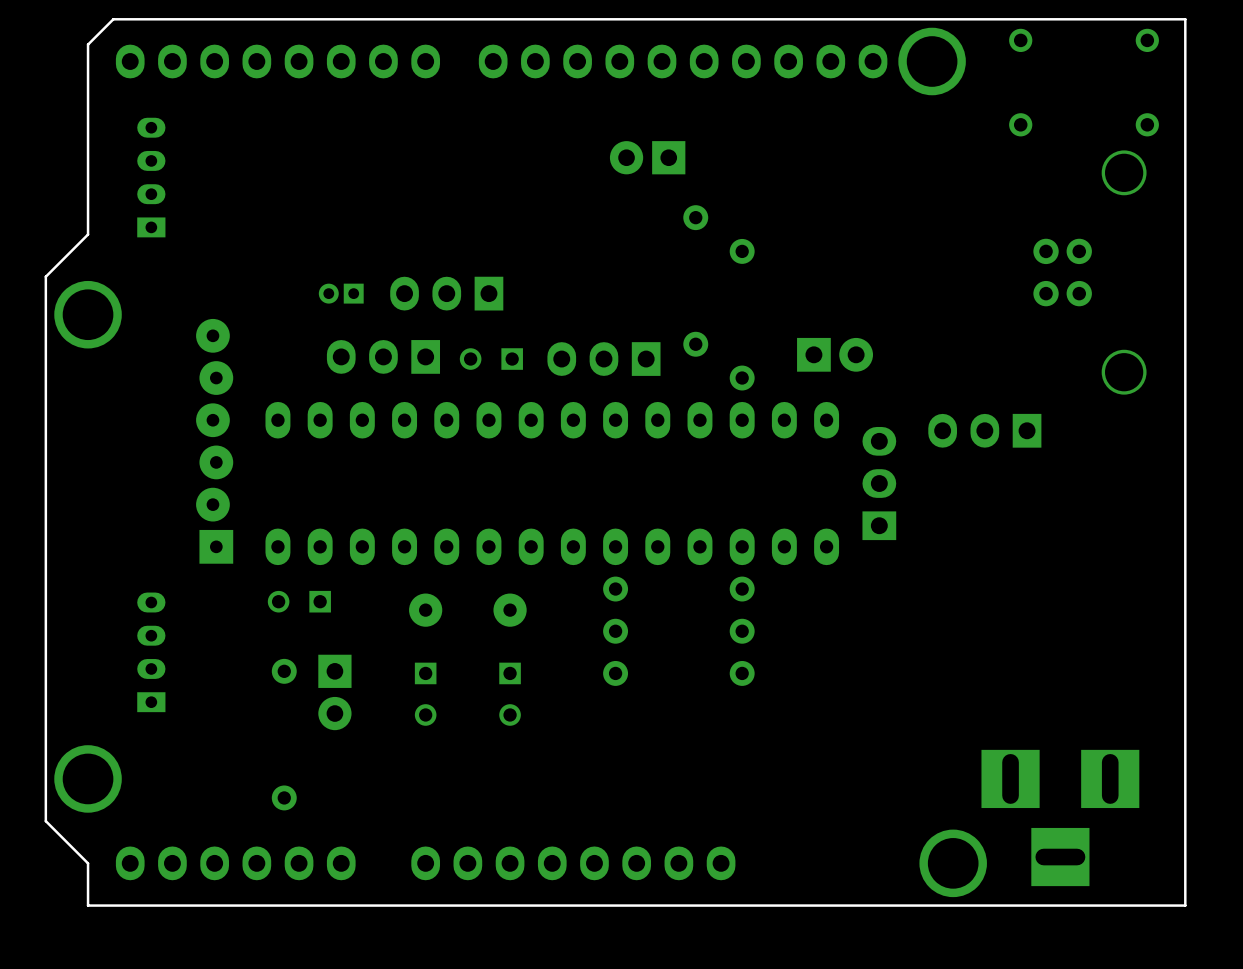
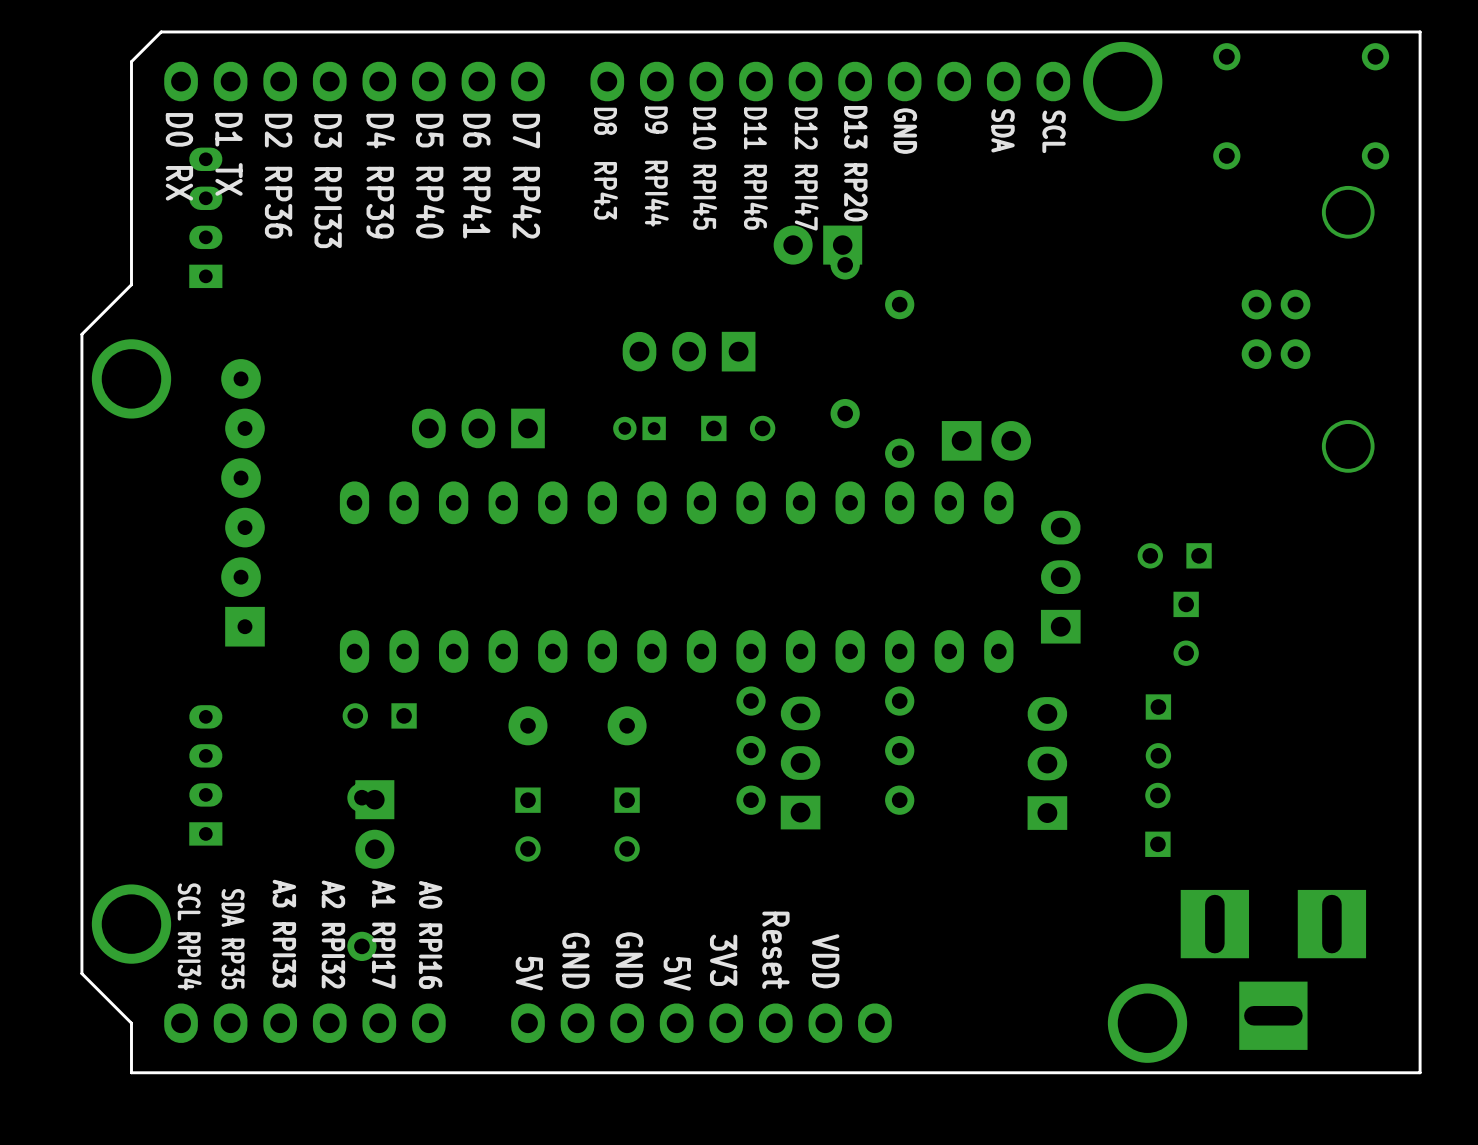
text: none -> GND (905, 131)
text: none -> SDA (1003, 130)
text: none -> SCL (1054, 131)
text: none -> D1 TX (229, 154)
text: none -> D0 RX (179, 156)
text: none -> D8 RP43 (605, 163)
text: none -> D13 RP20 (855, 163)
text: none -> D9 RPI44 (656, 166)
text: none -> D10 RPI45 (705, 168)
text: none -> D11 RPI46 (755, 168)
text: none -> D12 RPI47 (806, 169)
text: none -> D2 RP36 (278, 176)
text: none -> D4 RP39 (380, 176)
text: none -> D5 RP40 (430, 176)
text: none -> D6 RP41 (477, 176)
text: none -> D7 RP42 (526, 176)
text: none -> D3 RPI33 (328, 181)
part position: (647, 157) -> (817, 245)
part position: (341, 293) -> (639, 428)
part position: (446, 293) -> (689, 351)
part footprint: [547, 342, 661, 376] -> [701, 415, 776, 442]
part position: (835, 354) -> (986, 440)
part: (491, 359) -> none
part: (984, 430) -> none
part position: (214, 441) -> (243, 502)
part: none -> (1174, 555)
part: none -> (1186, 628)
part: none -> (1158, 731)
part: none -> (800, 763)
part: none -> (1047, 763)
part: none -> (1157, 819)
part position: (334, 692) -> (374, 824)
text: none -> A3 RPI33 (284, 933)
text: none -> A2 RPI32 (333, 934)
text: none -> A1 RPI17 (383, 934)
text: none -> A0 RPI16 (430, 934)
text: none -> SCL RPI34 (189, 936)
text: none -> SDA RP35 (233, 939)
text: none -> Reset (775, 950)
text: none -> GND (629, 960)
text: none -> 3V3 (723, 960)
text: none -> GND (575, 960)
text: none -> VDD (825, 961)
text: none -> 5V (529, 973)
text: none -> 5V (677, 973)

